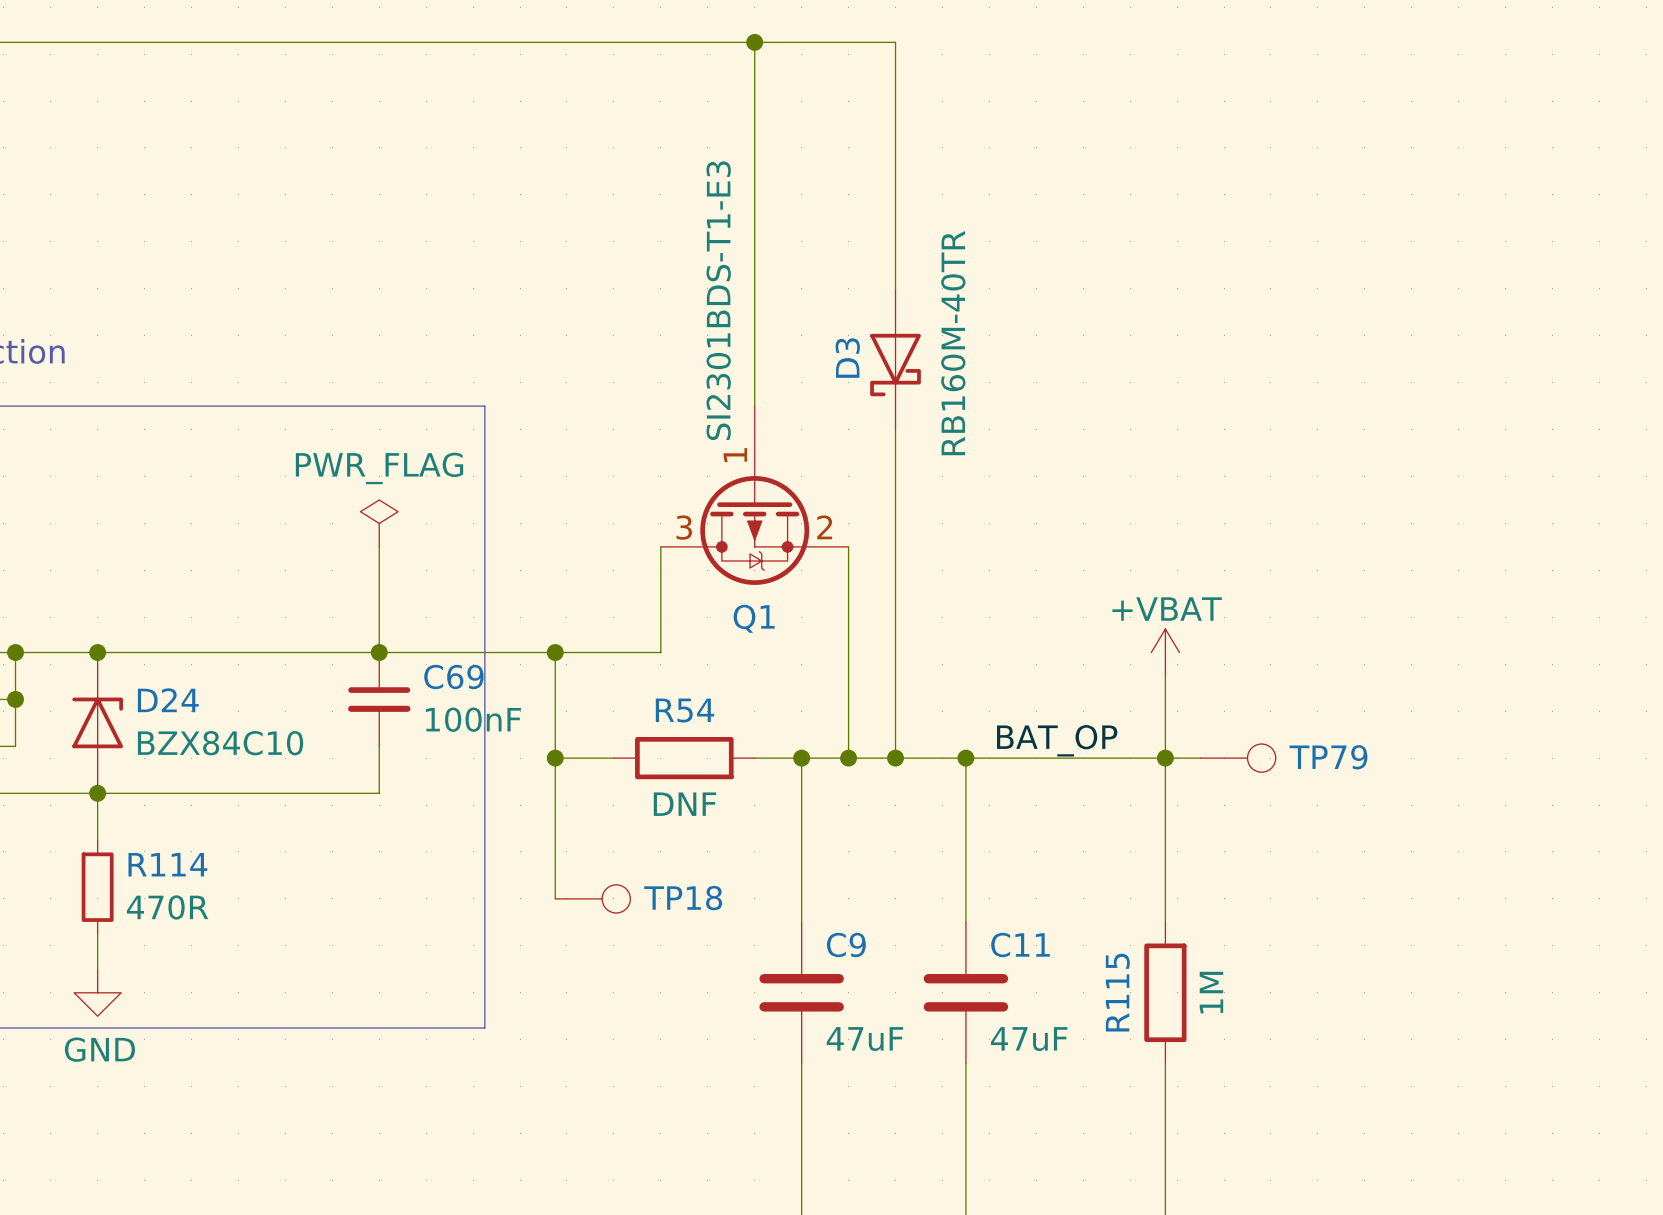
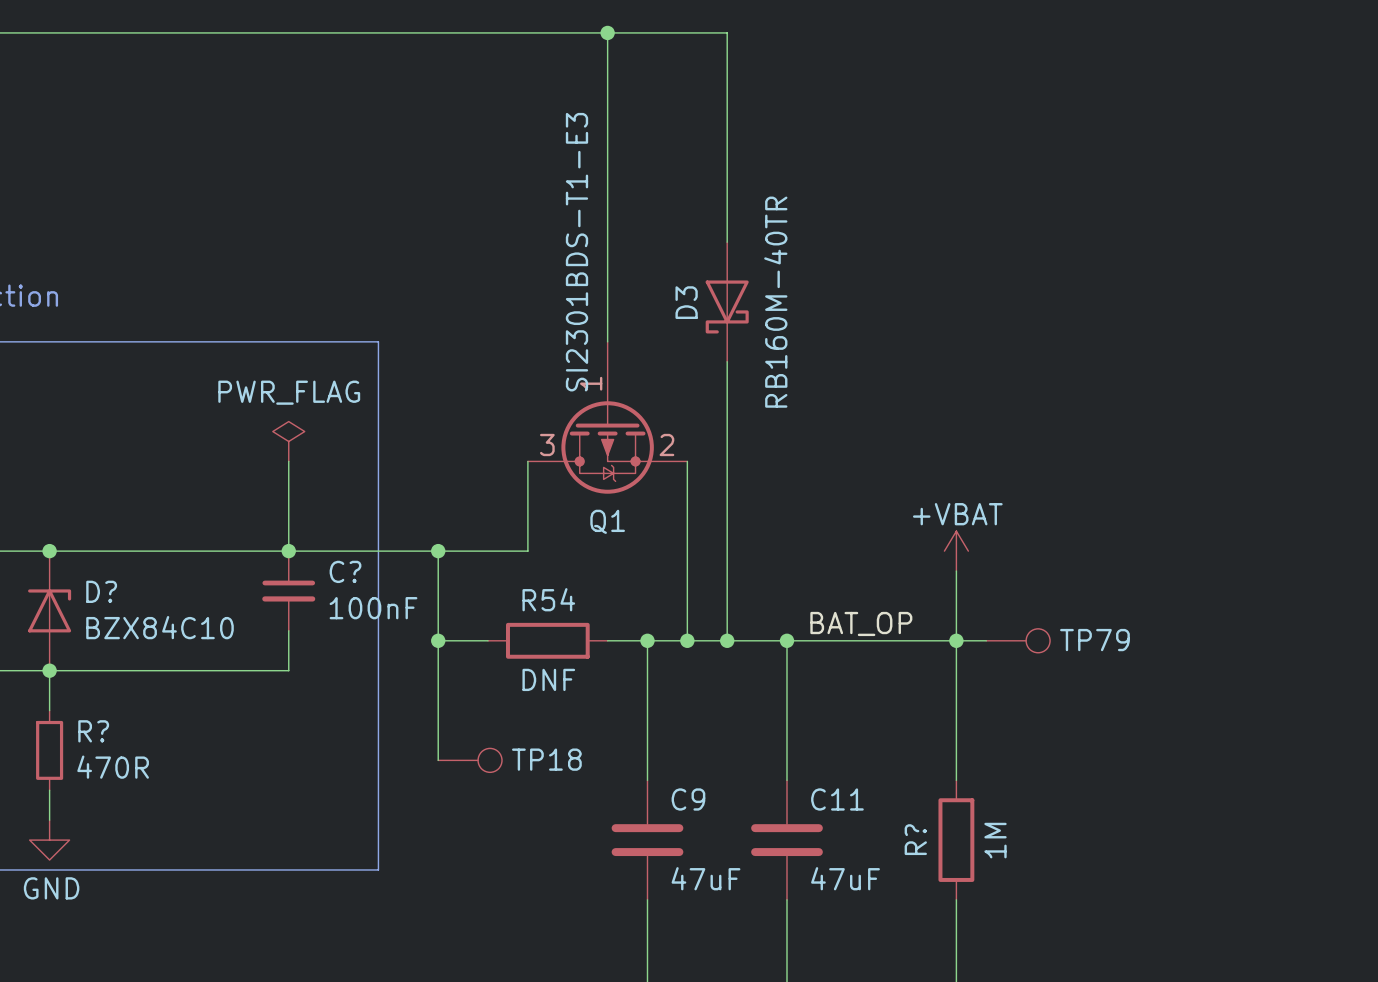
C69 name: C69 (453, 677) -> C? (345, 571)
D24 name: D24 (168, 700) -> D? (101, 591)
R114 name: R114 (167, 864) -> R? (93, 731)
R115 name: R115 (1117, 992) -> R? (915, 839)

